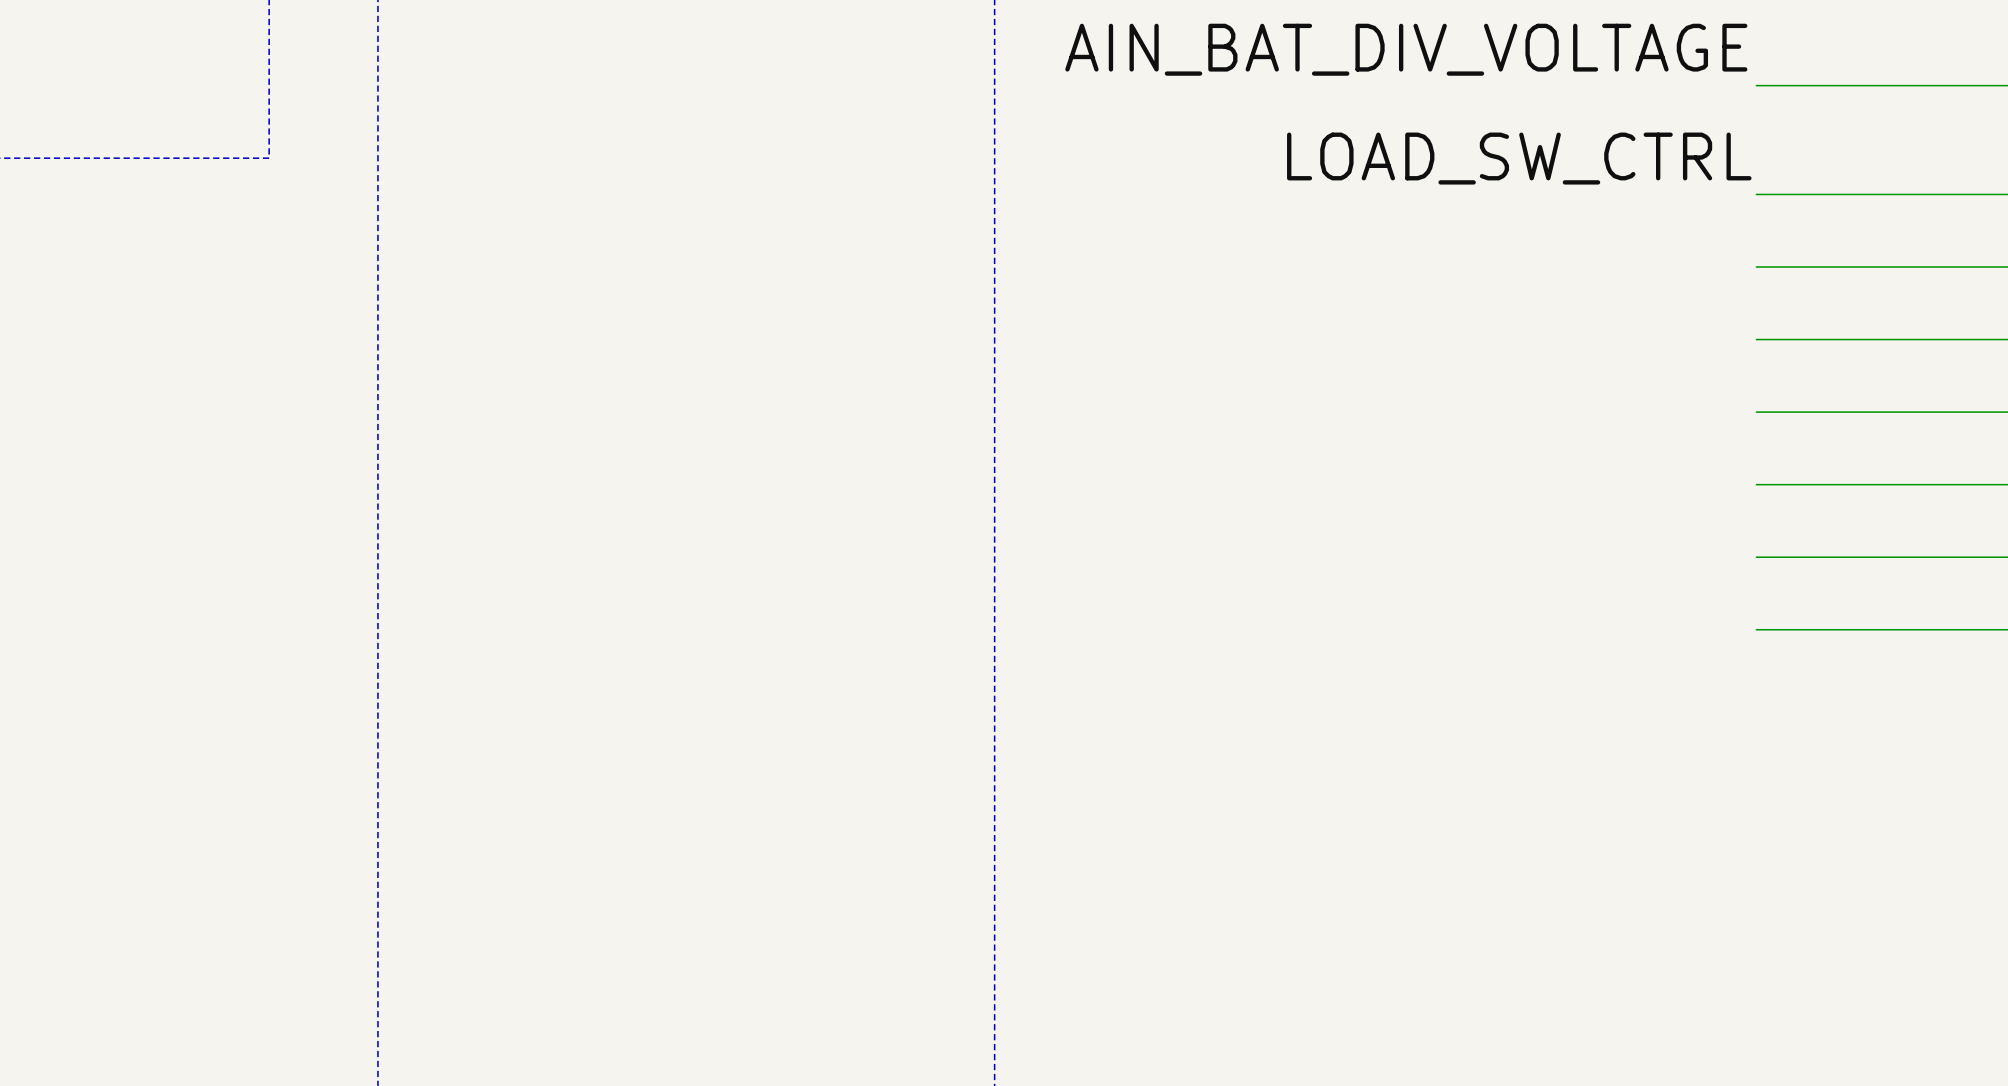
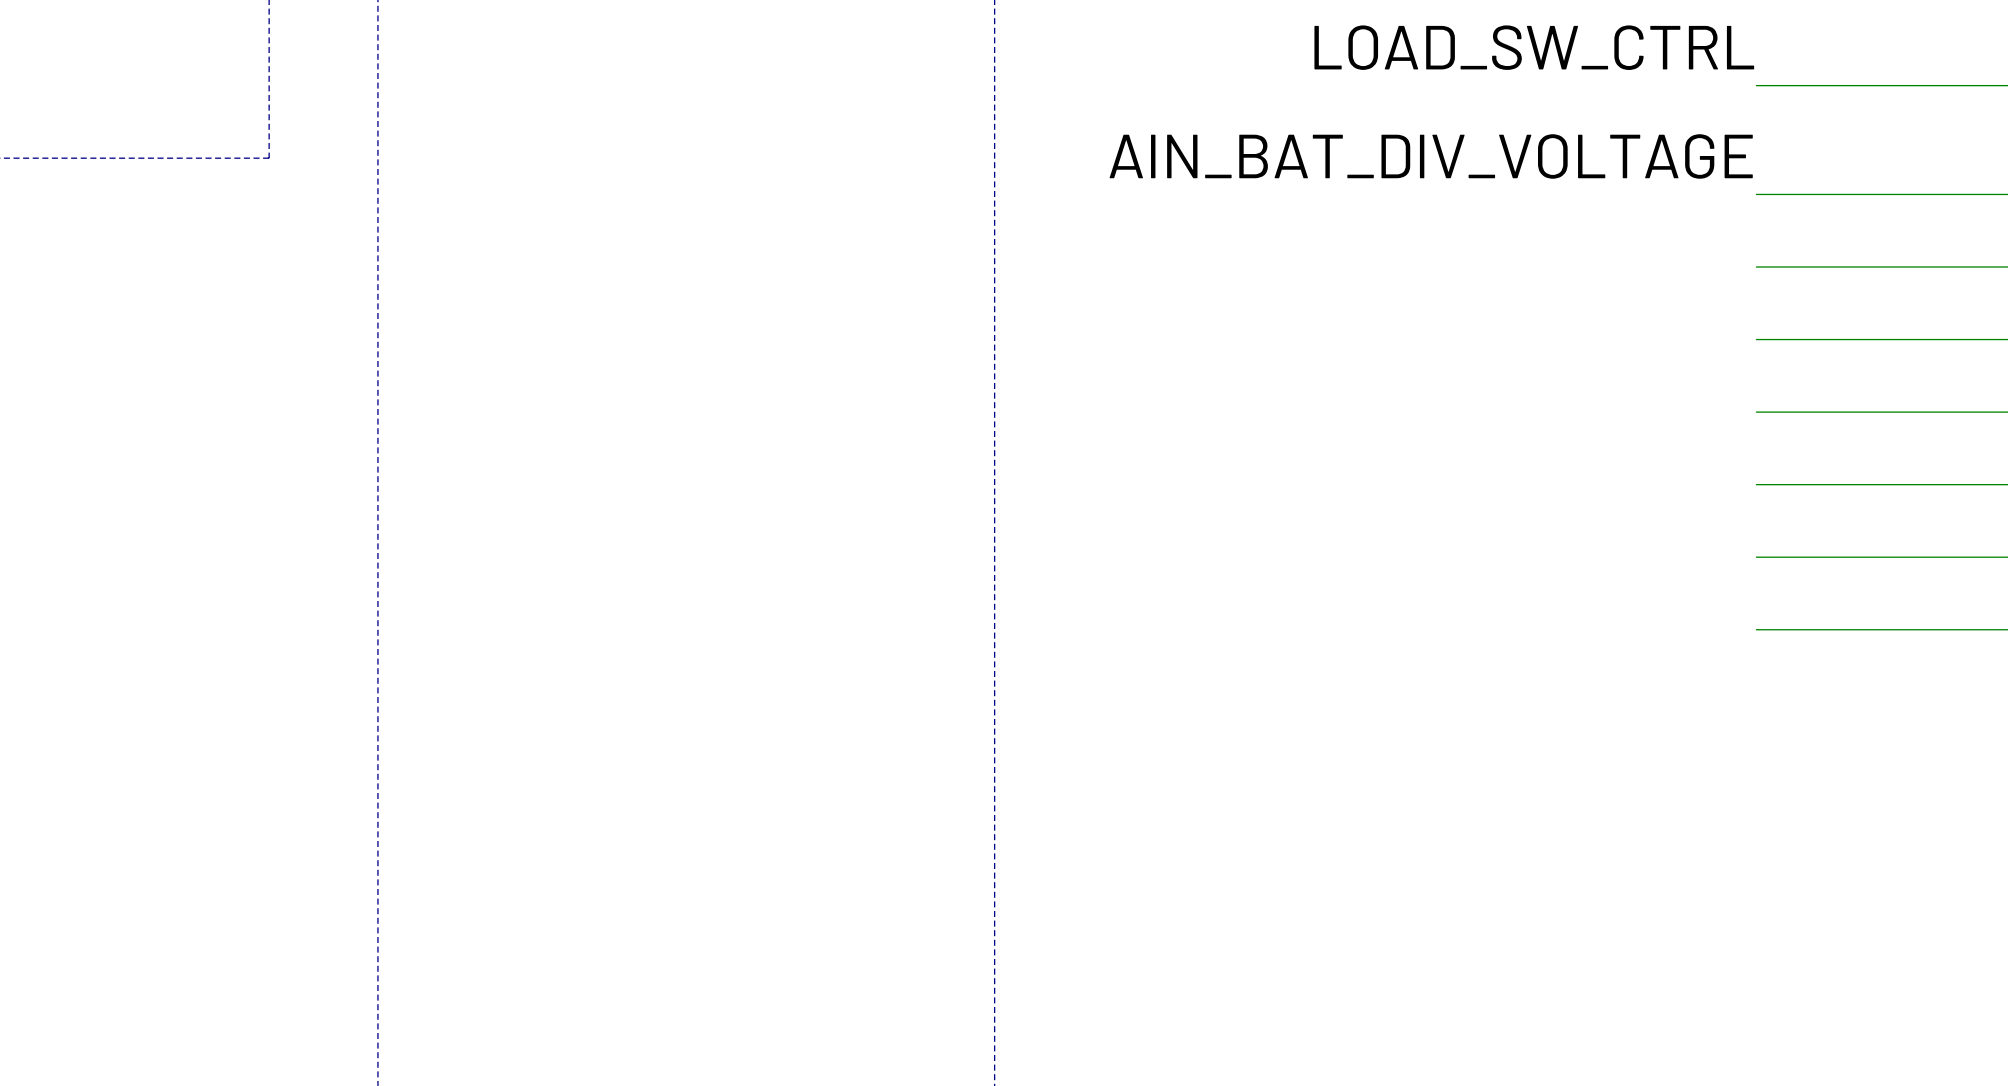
label: AIN_BAT_DIV_VOLTAGE (1406, 49) -> LOAD_SW_CTRL (1534, 47)
label: LOAD_SW_CTRL (1519, 158) -> AIN_BAT_DIV_VOLTAGE (1431, 156)

